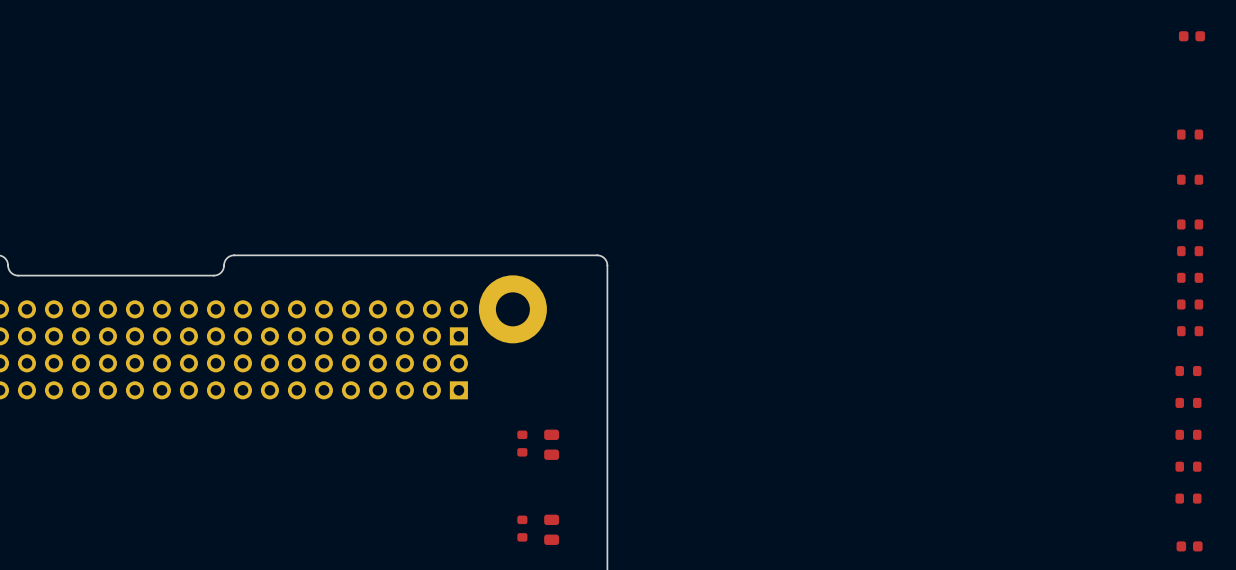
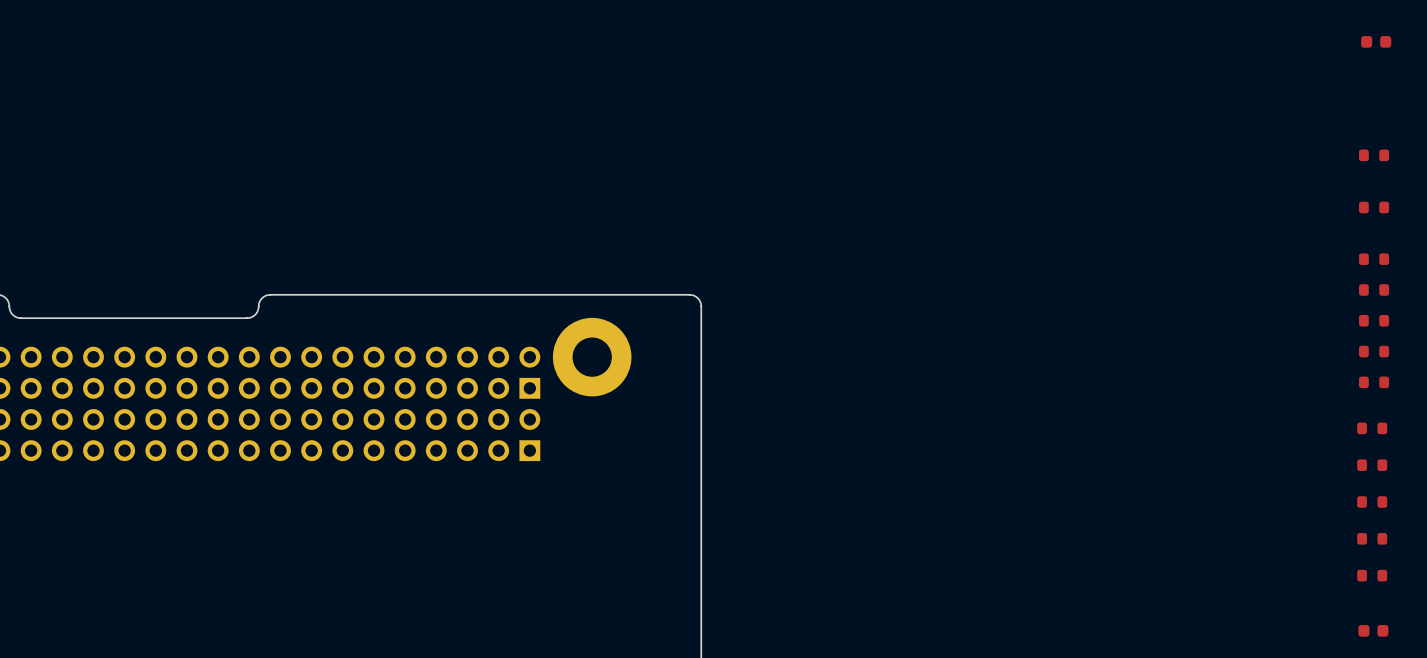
part: (522, 443) -> none
part: (551, 444) -> none
part: (522, 528) -> none
part: (551, 529) -> none

